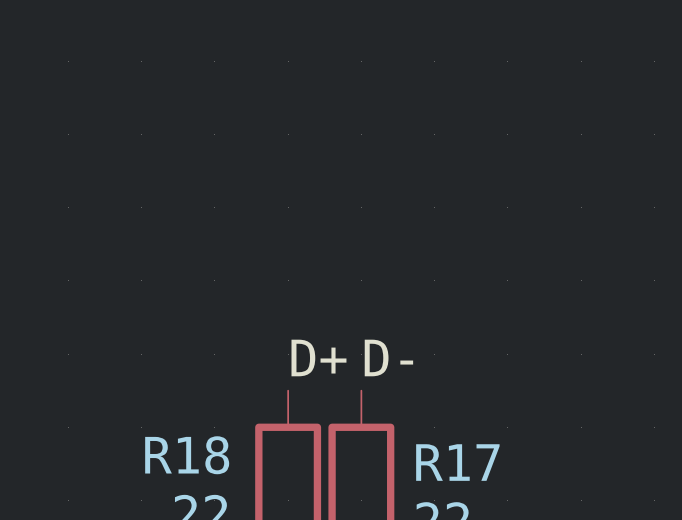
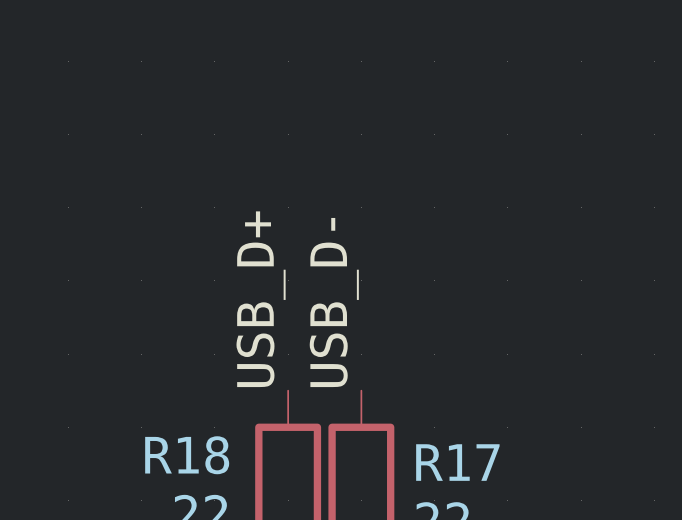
label: D+ (318, 357) -> USB_D+ (261, 299)
label: D- (388, 357) -> USB_D- (334, 302)

